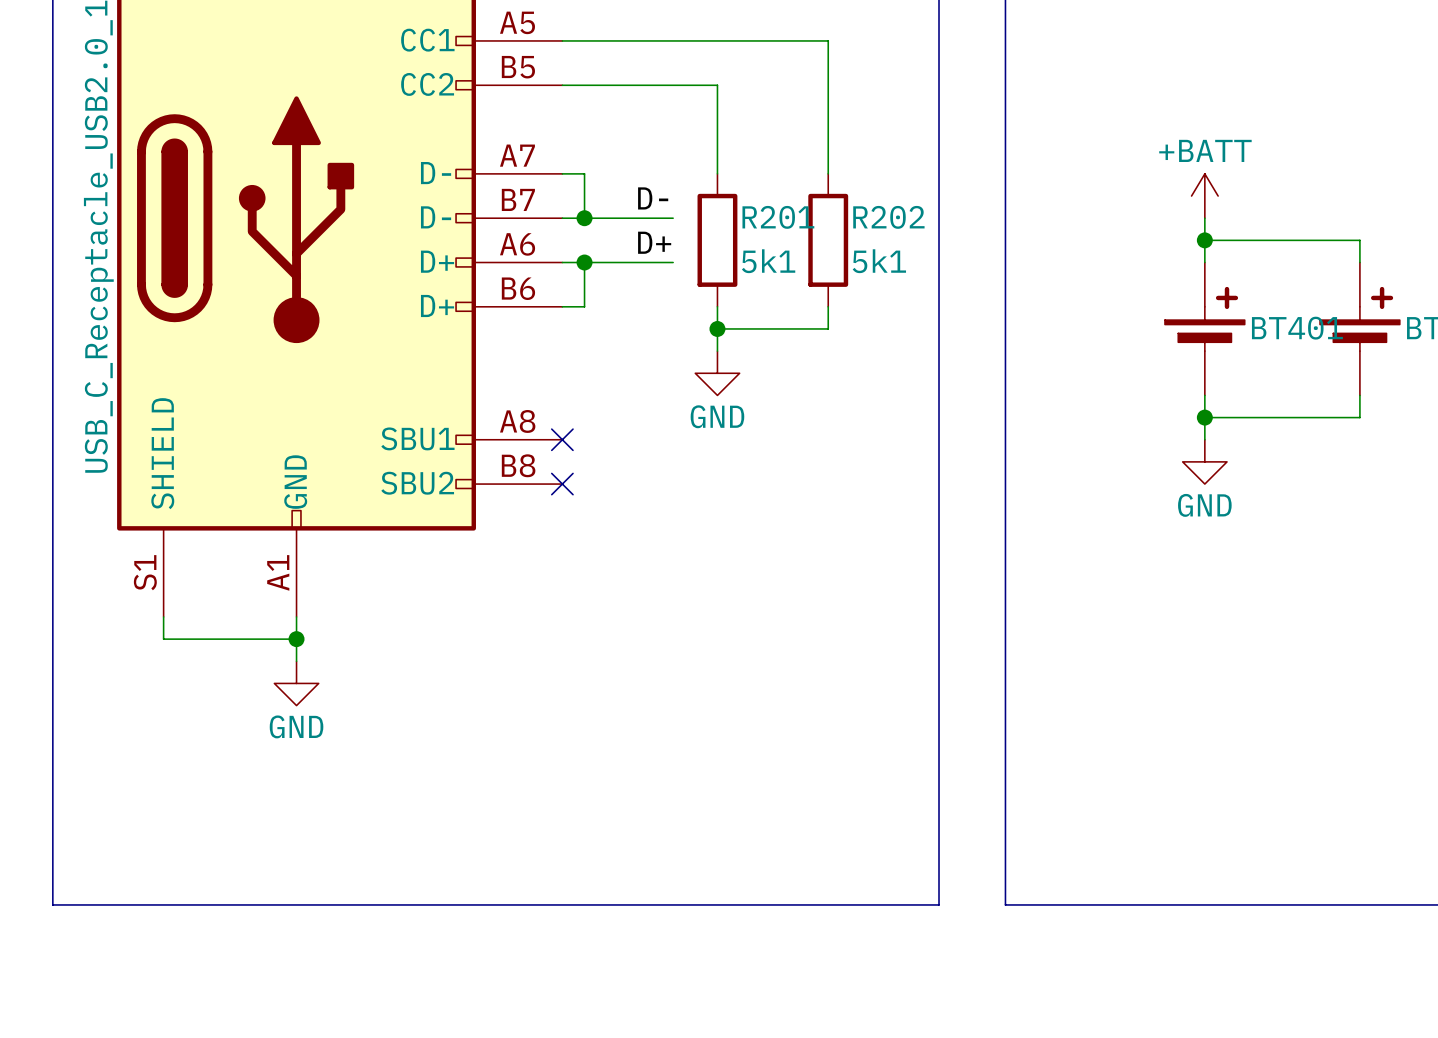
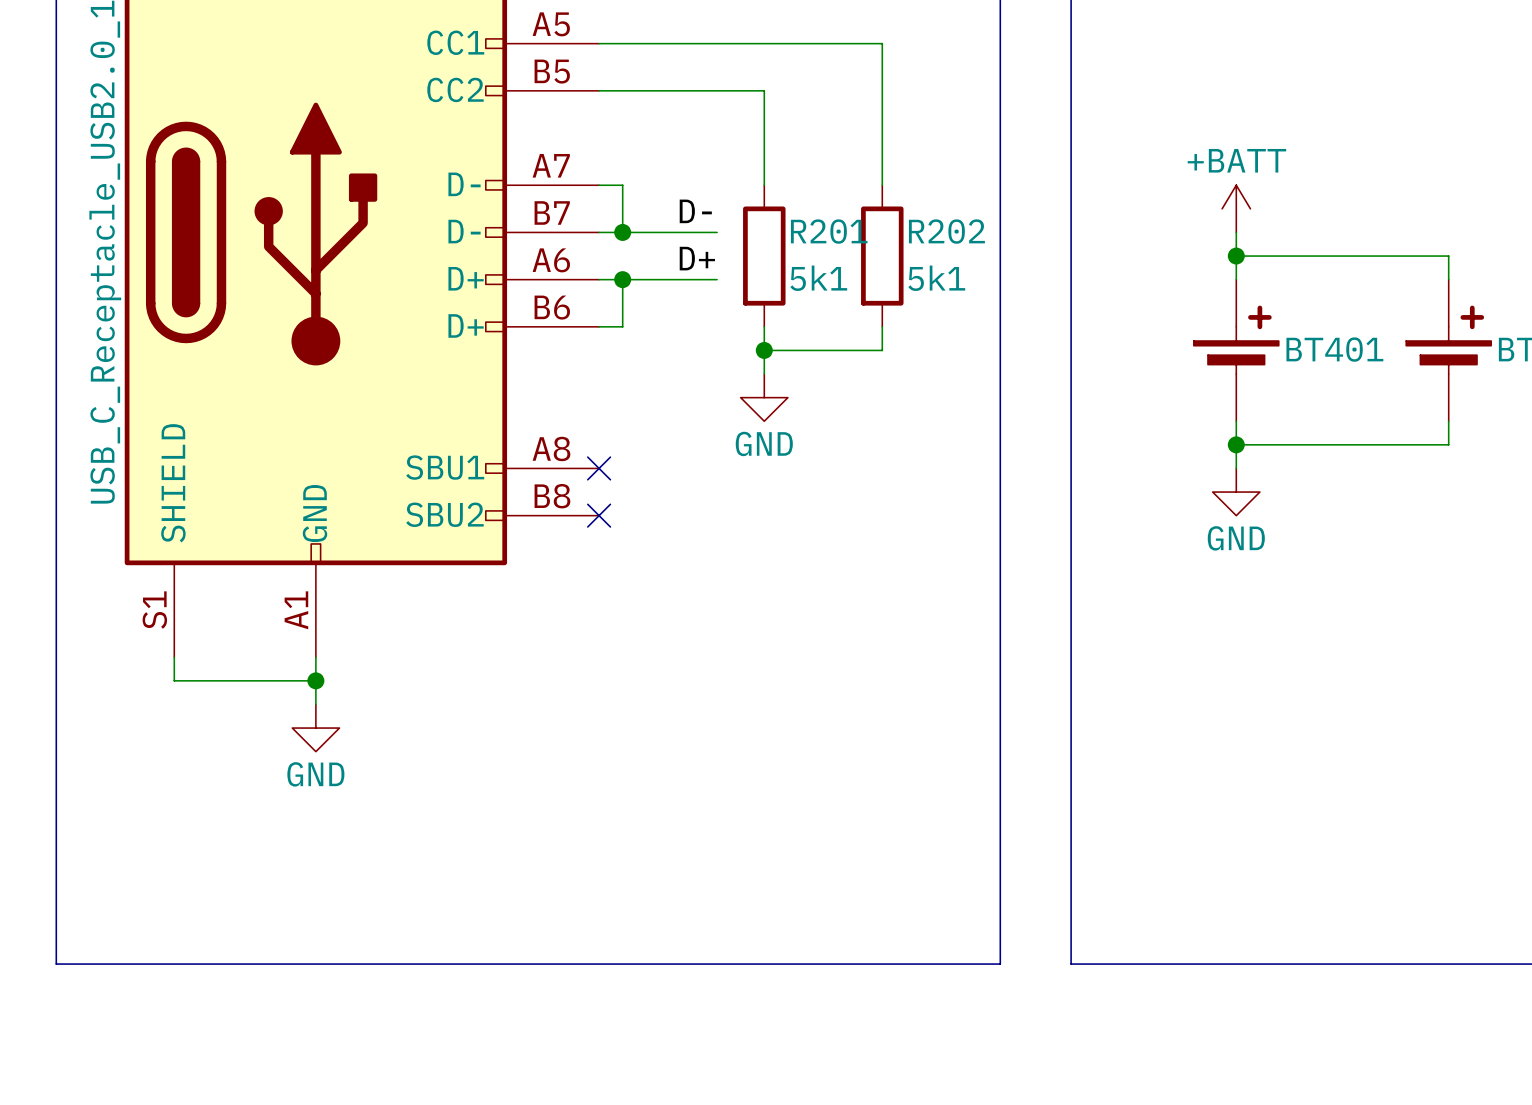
power symbol position: +BATT (1204, 196) -> +BATT (1236, 208)
wire: (1204, 218) (1204, 262) -> (1236, 232) (1236, 279)
wire: none -> (1236, 256) (1283, 256)
junction position: (1204, 240) -> (1236, 256)
BT401 position: (1204, 328) -> (1236, 350)
wire: (1204, 395) (1204, 439) -> (1236, 421) (1236, 468)
wire: none -> (1236, 444) (1283, 444)
junction position: (1204, 417) -> (1236, 444)
power symbol position: GND (1204, 461) -> GND (1236, 492)

